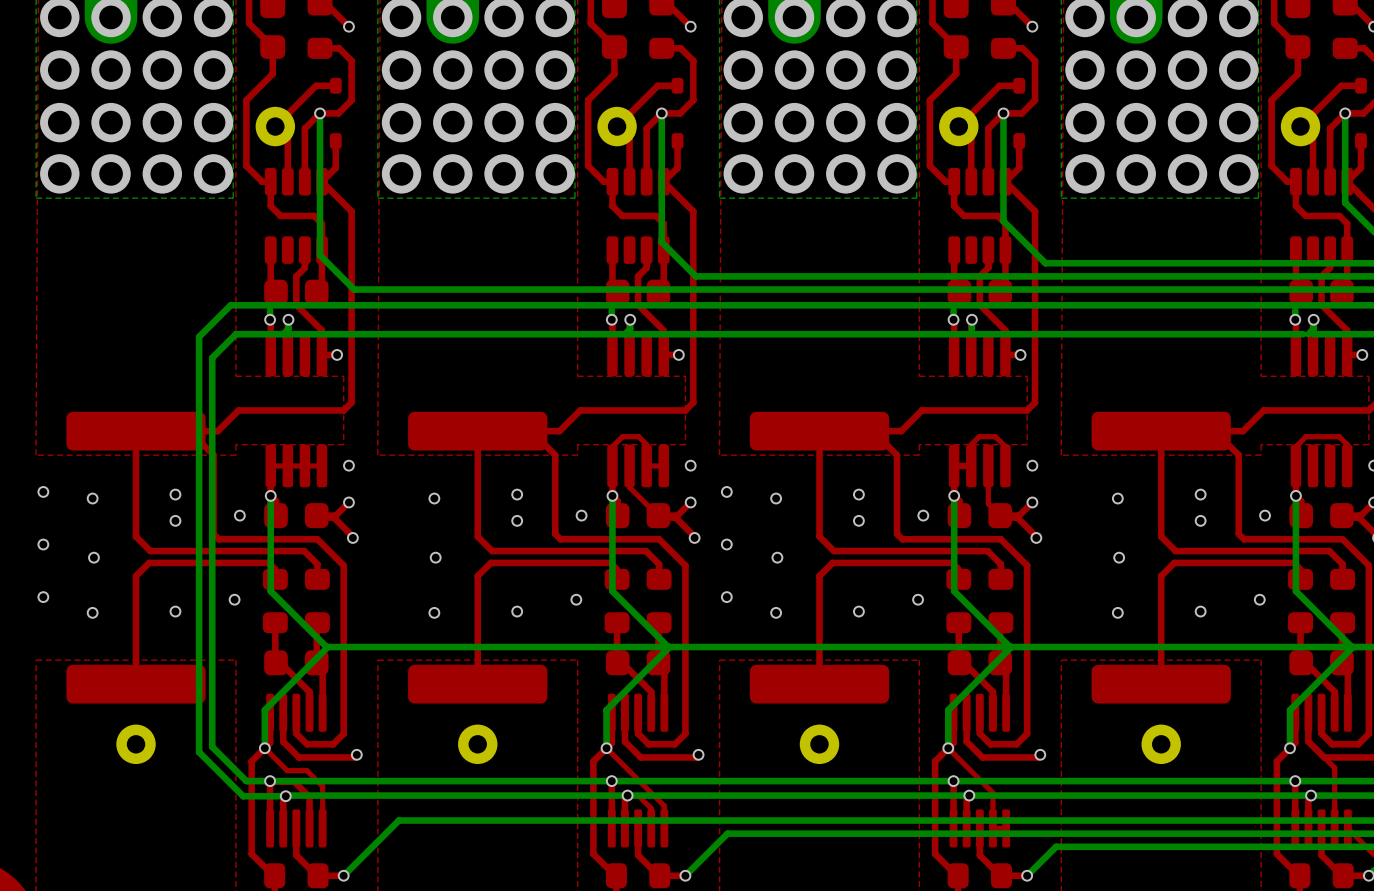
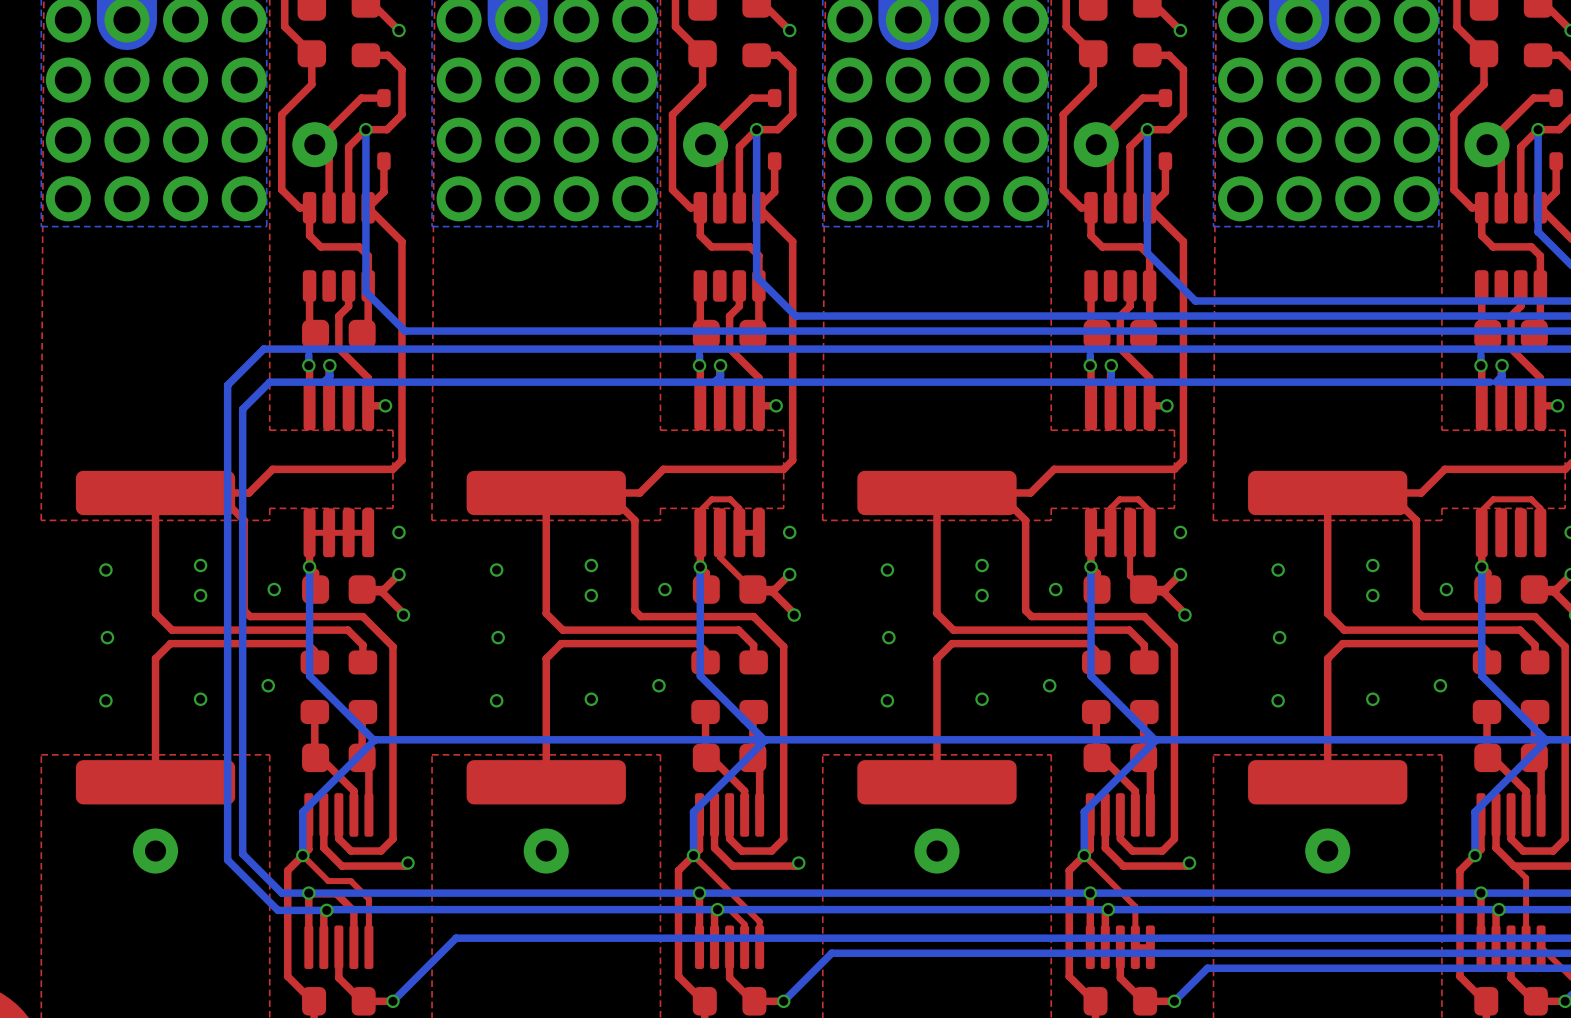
via: (43, 491) -> none
via: (726, 491) -> none
via: (43, 544) -> none
via: (726, 544) -> none
via: (43, 597) -> none
via: (726, 597) -> none

